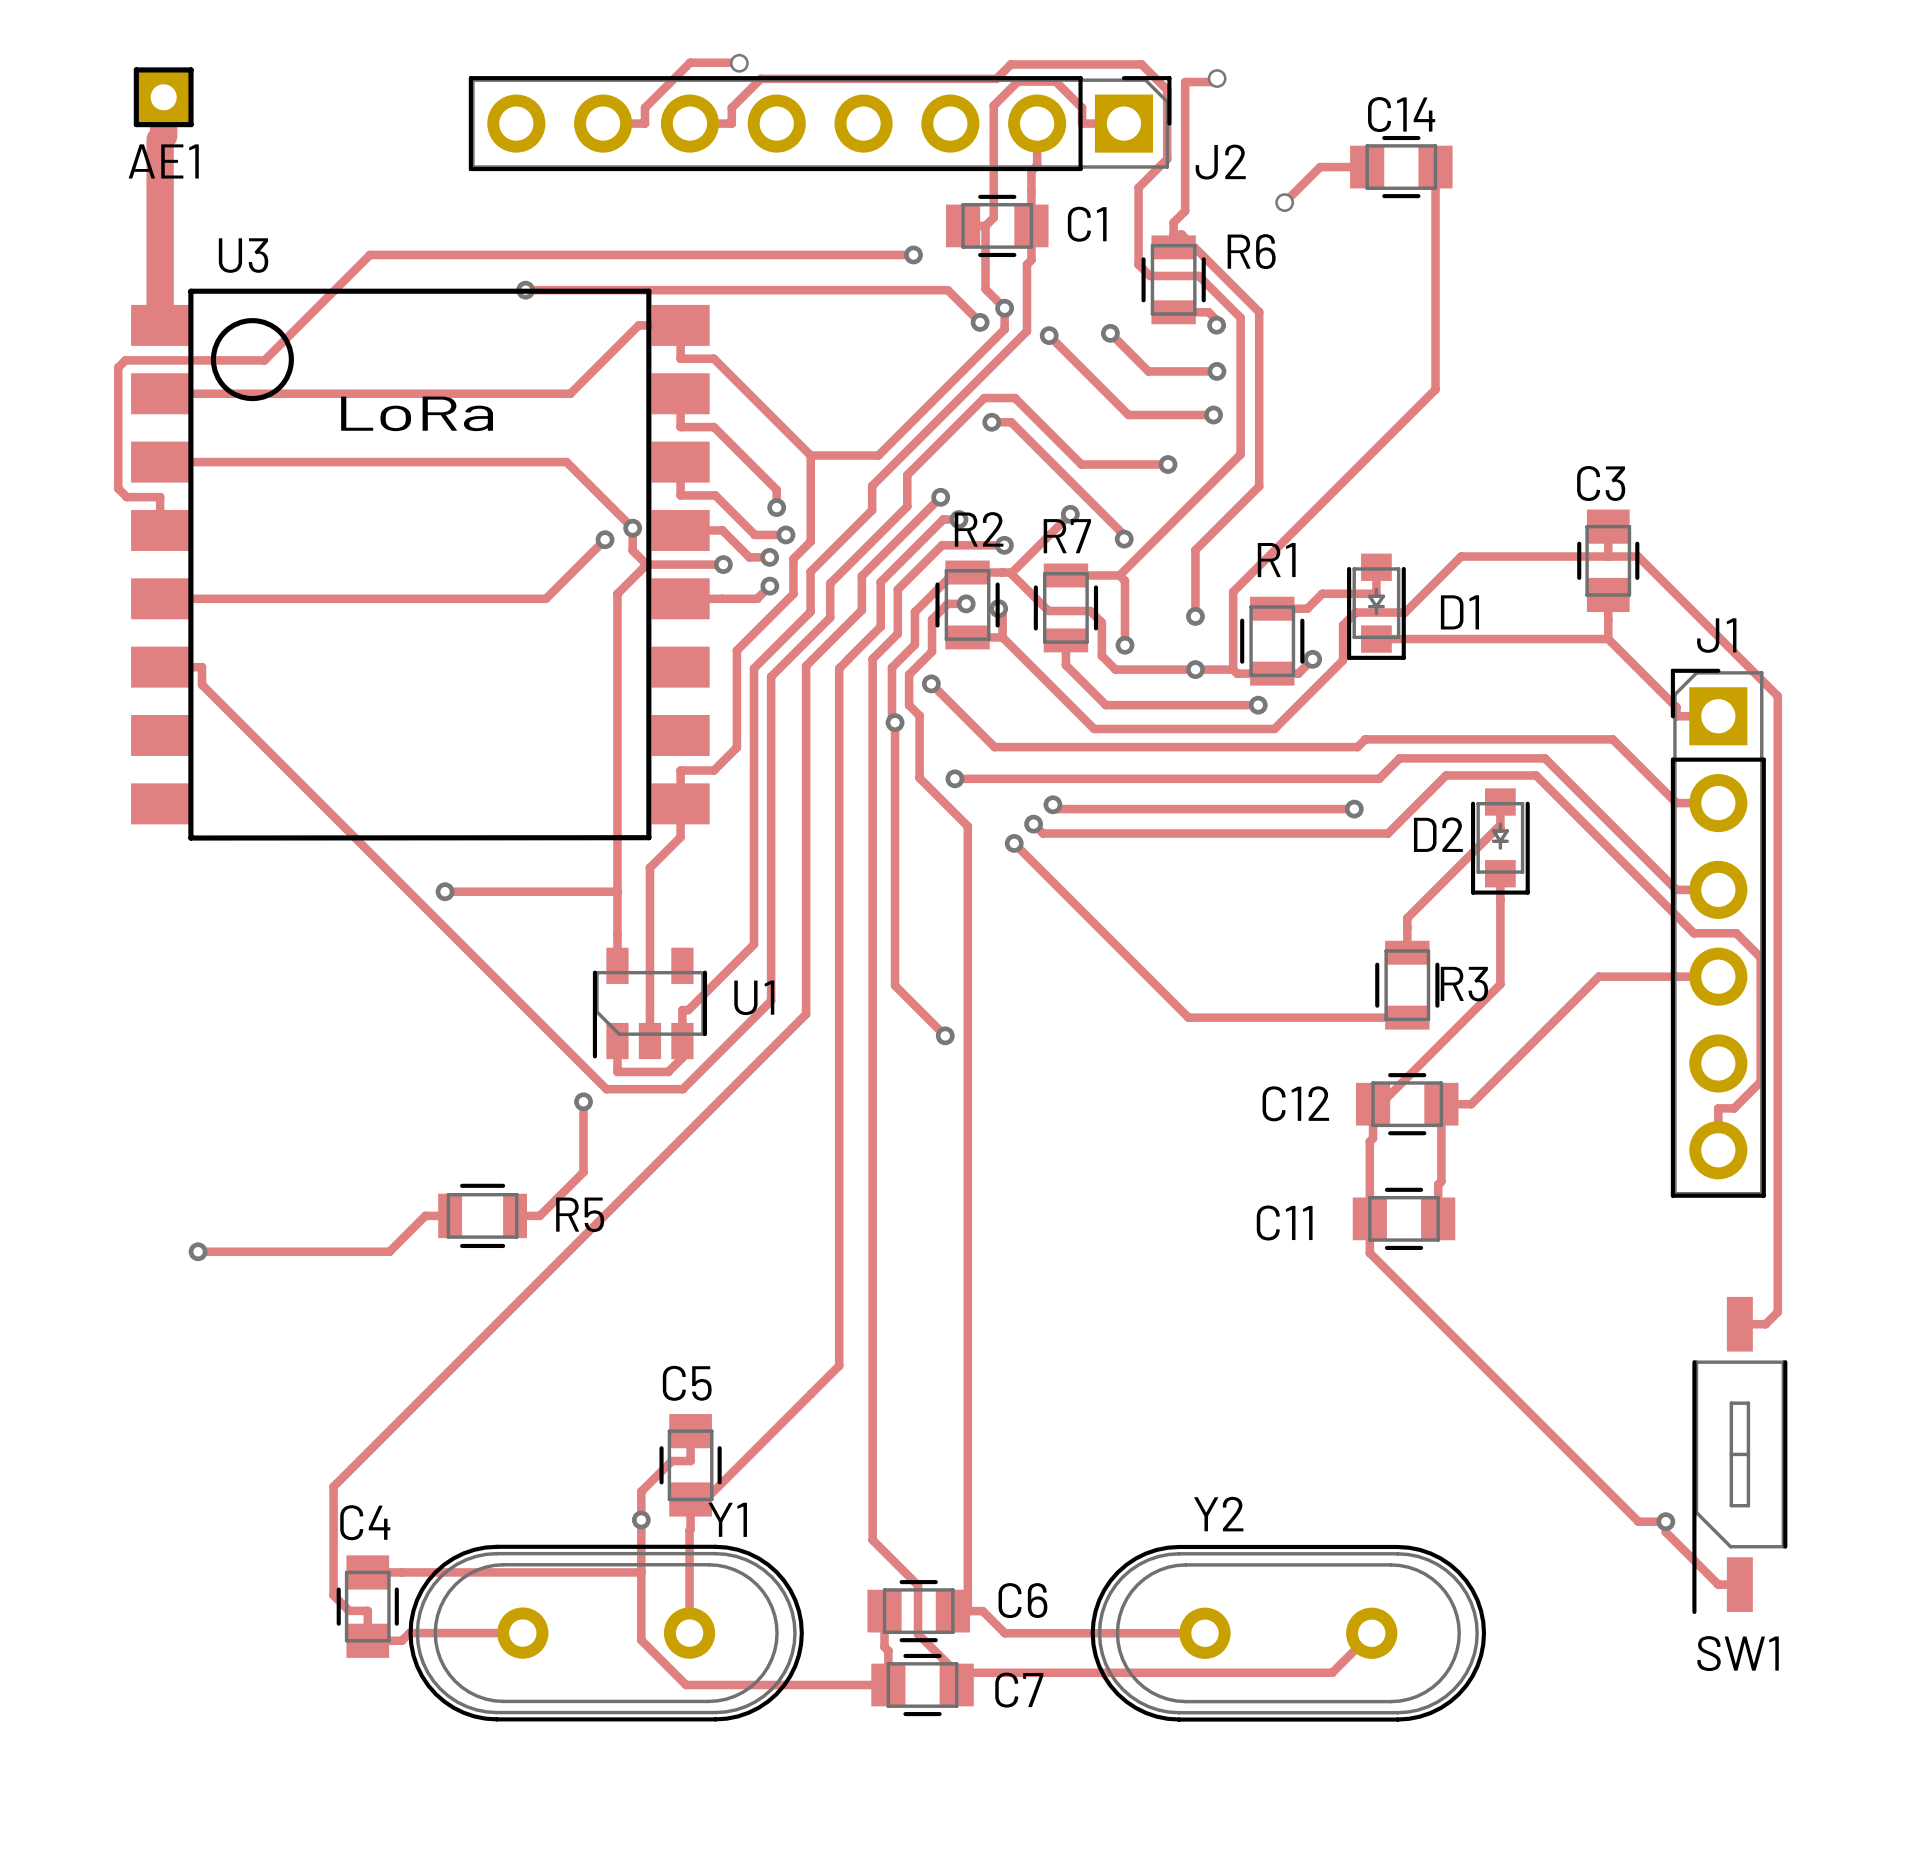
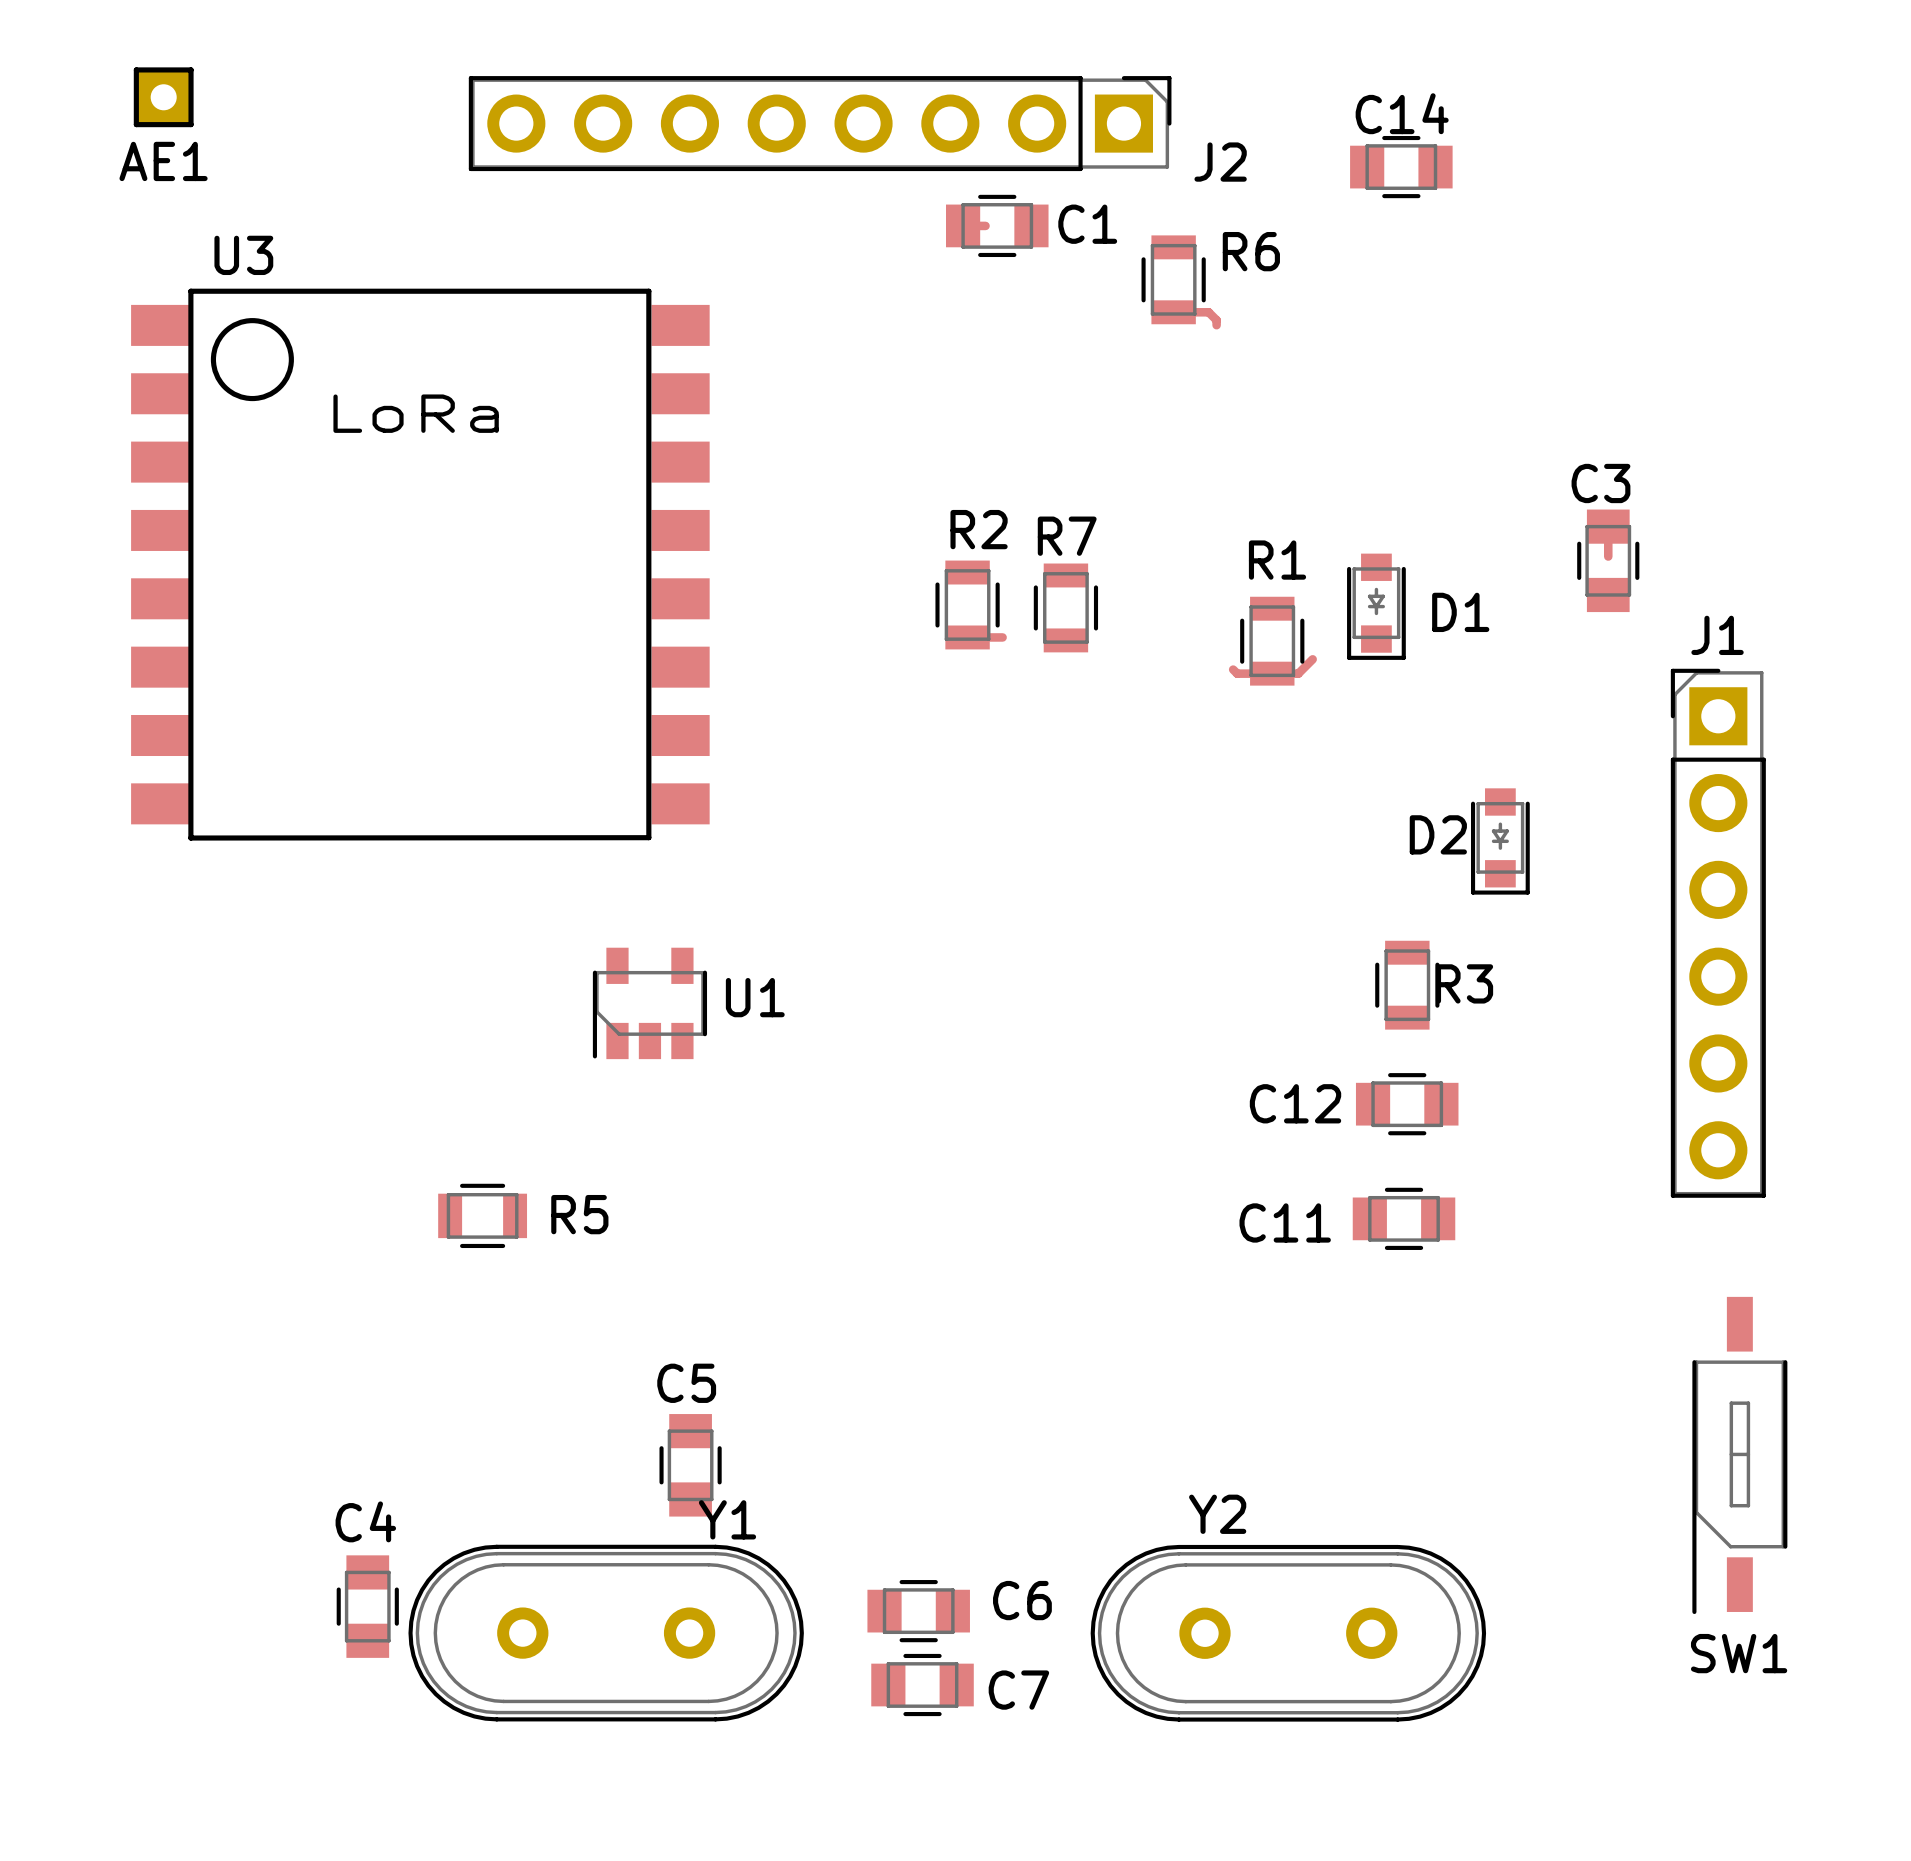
track: (739, 63) (690, 62) (645, 107) (645, 123) (603, 123) -> none
via: (739, 63) -> none
track: (1217, 78) (1213, 82) (1185, 82) (1185, 211) (1173, 222) (1173, 247) -> none
via: (1217, 78) -> none
track: (163, 97) (163, 136) (160, 139) (160, 325) -> none
track: (689, 123) (731, 123) (731, 107) (760, 78) (996, 78) (1010, 64) (1141, 64) (1167, 90) (1167, 159) (1138, 187) (1138, 264) (1149, 275) (1198, 275) (1240, 317) (1240, 454) (1119, 575) -> none
track: (1037, 123) (1037, 165) (1031, 171) (1031, 260) (1026, 264) (1026, 331) (872, 486) (872, 510) (810, 571) (810, 611) (754, 668) (754, 944) (688, 1010) (682, 1010) (682, 1057) (668, 1071) (617, 1071) (617, 1041) -> none
track: (1123, 123) (1082, 123) (1082, 107) (1055, 81) (1017, 81) (993, 105) (993, 217) (985, 225) (985, 289) (1004, 308) (1004, 329) (878, 455) (810, 455) -> none
track: (1367, 167) (1320, 167) (1284, 202) -> none
track: (1435, 167) (1435, 389) (1233, 591) (1233, 669) (1115, 669) (1101, 655) (1101, 622) (1090, 611) (1048, 611) (1012, 574) (1012, 572) (1070, 514) -> none
via: (1284, 202) -> none
track: (1173, 234) (1181, 234) (1259, 312) (1259, 486) (1195, 550) (1195, 616) -> none
track: (913, 254) (369, 254) (264, 360) (125, 360) (118, 367) (118, 488) (126, 497) (160, 497) (160, 530) -> none
via: (913, 254) -> none
track: (525, 290) (947, 290) (980, 322) -> none
via: (525, 290) -> none
via: (1004, 308) -> none
via: (980, 322) -> none
via: (1216, 325) -> none
track: (1110, 333) (1148, 371) (1216, 371) -> none
via: (1110, 333) -> none
track: (1049, 335) (1128, 415) (1213, 415) -> none
via: (1049, 335) -> none
via: (1216, 371) -> none
track: (160, 393) (570, 393) (638, 325) (680, 325) (680, 358) (713, 358) (810, 455) -> none
track: (680, 393) (680, 427) (713, 427) (776, 489) (776, 507) -> none
via: (1213, 415) -> none
track: (991, 422) (1011, 422) (1124, 535) (1124, 539) -> none
via: (991, 422) -> none
track: (810, 455) (810, 541) (793, 558) (793, 593) (736, 650) (736, 747) (713, 770) (680, 770) (680, 837) (649, 867) (649, 1041) -> none
track: (160, 462) (566, 462) (632, 528) (632, 550) (646, 564) -> none
track: (680, 462) (680, 495) (715, 495) (754, 534) (785, 534) -> none
track: (1168, 464) (1081, 464) (1015, 398) (984, 398) (907, 475) (907, 506) (830, 583) (830, 617) (771, 676) (771, 1000) (682, 1089) (606, 1089) (202, 684) (202, 667) (160, 667) -> none
via: (1168, 464) -> none
track: (940, 497) (861, 576) (861, 610) (806, 665) (806, 1014) (333, 1486) (333, 1595) (349, 1610) (367, 1610) (367, 1640) (401, 1640) (409, 1633) (522, 1633) -> none
via: (940, 497) -> none
via: (776, 507) -> none
via: (1070, 514) -> none
track: (958, 519) (943, 519) (880, 582) (880, 626) (839, 668) (839, 1365) (690, 1514) -> none
via: (958, 519) -> none
via: (632, 528) -> none
track: (680, 530) (722, 530) (749, 557) (769, 557) -> none
via: (785, 534) -> none
track: (605, 539) (545, 598) (160, 598) -> none
via: (605, 539) -> none
via: (1124, 539) -> none
track: (1004, 545) (942, 545) (897, 589) (897, 633) (872, 658) (872, 1540) (918, 1585) (918, 1634) (956, 1672) -> none
via: (1004, 545) -> none
via: (769, 557) -> none
track: (646, 564) (617, 593) (617, 965) -> none
track: (646, 564) (723, 564) -> none
via: (723, 564) -> none
track: (1376, 567) (1376, 593) (1322, 593) (1307, 608) (1272, 608) -> none
track: (1012, 572) (954, 572) (914, 612) (914, 644) (891, 667) (891, 719) (895, 722) (895, 985) (945, 1035) -> none
track: (1065, 575) (1119, 575) -> none
track: (1119, 575) (1124, 580) (1124, 645) -> none
track: (769, 586) (757, 598) (680, 598) -> none
via: (769, 586) -> none
track: (1608, 594) (1608, 639) -> none
track: (966, 603) (947, 603) (932, 619) (932, 651) (909, 674) (909, 705) (919, 715) (919, 778) (967, 826) (967, 1611) -> none
via: (966, 603) -> none
track: (998, 608) (1002, 612) (1002, 637) (1094, 728) (1274, 728) (1343, 660) (1343, 625) (1355, 612) (1405, 612) (1461, 556) (1638, 556) (1777, 696) (1777, 1312) (1765, 1324) (1739, 1324) -> none
via: (998, 608) -> none
via: (1195, 616) -> none
track: (1376, 639) (1608, 639) -> none
track: (1608, 639) (1676, 707) (1676, 716) (1718, 716) -> none
track: (1065, 640) (1065, 665) (1105, 705) (1258, 705) -> none
via: (1124, 645) -> none
via: (1312, 659) -> none
via: (1195, 669) -> none
track: (931, 683) (994, 747) (1357, 747) (1365, 739) (1612, 739) (1676, 803) (1718, 803) -> none
via: (931, 683) -> none
via: (1258, 705) -> none
via: (895, 722) -> none
track: (954, 778) (1379, 778) (1399, 758) (1545, 758) (1676, 889) (1718, 889) -> none
via: (954, 778) -> none
track: (1500, 802) (1500, 828) (1496, 828) (1407, 918) (1407, 952) -> none
track: (1052, 804) (1057, 809) (1354, 809) -> none
via: (1052, 804) -> none
via: (1354, 809) -> none
track: (1033, 824) (1043, 833) (1388, 833) (1446, 775) (1536, 775) (1693, 933) (1736, 933) (1760, 957) (1760, 1081) (1734, 1108) (1718, 1108) (1718, 1150) -> none
via: (1033, 824) -> none
track: (1014, 843) (1188, 1017) (1407, 1017) -> none
via: (1014, 843) -> none
track: (1500, 873) (1500, 984) (1380, 1104) (1373, 1104) (1373, 1138) (1369, 1141) (1369, 1253) (1638, 1521) (1665, 1521) (1665, 1532) (1718, 1584) (1739, 1584) -> none
track: (445, 891) (617, 891) -> none
via: (445, 891) -> none
track: (1718, 976) (1598, 976) (1471, 1104) (1441, 1104) (1441, 1181) (1438, 1184) (1438, 1218) -> none
via: (945, 1035) -> none
track: (583, 1101) (583, 1172) (539, 1215) (515, 1215) -> none
via: (583, 1101) -> none
track: (450, 1215) (425, 1215) (389, 1251) (198, 1251) -> none
via: (198, 1251) -> none
track: (690, 1431) (690, 1461) (671, 1461) (641, 1491) (641, 1640) (686, 1685) (888, 1685) (888, 1650) (884, 1646) (884, 1611) -> none
track: (690, 1499) (689, 1633) -> none
via: (641, 1520) -> none
via: (1665, 1521) -> none
track: (367, 1572) (641, 1572) -> none
track: (952, 1611) (982, 1611) (1004, 1633) (1204, 1633) -> none
track: (1371, 1633) (1332, 1672) (956, 1672) -> none

